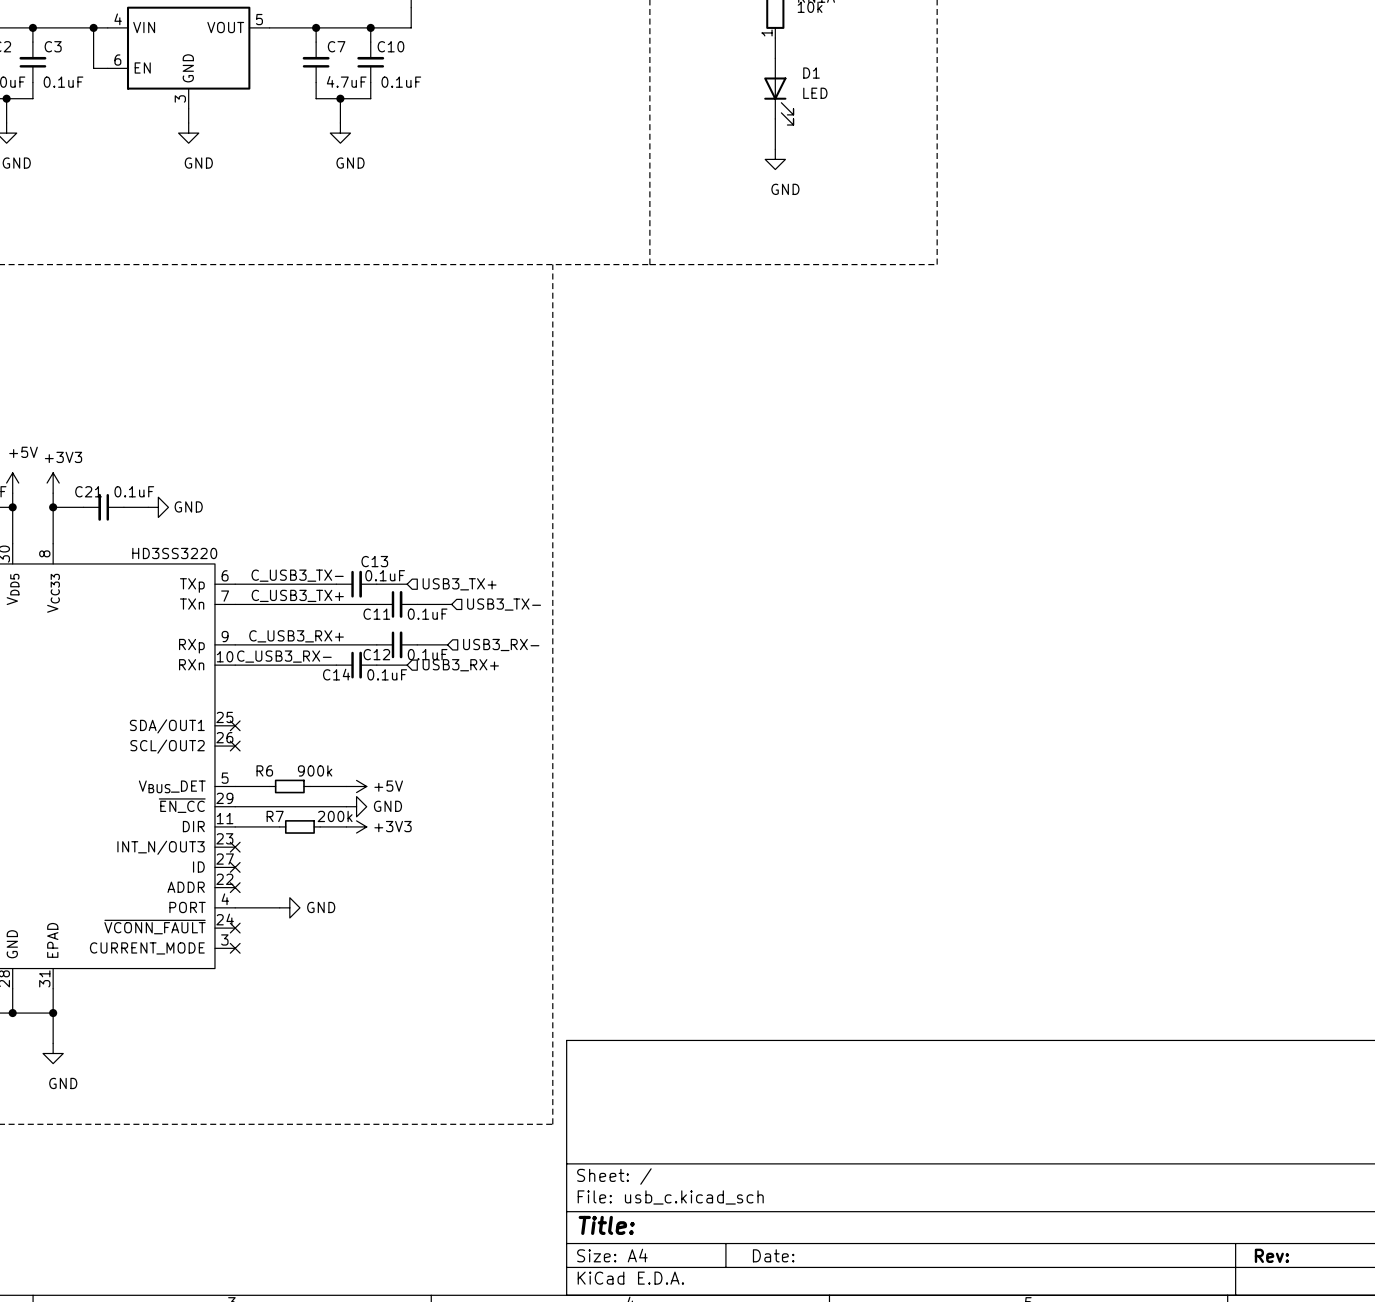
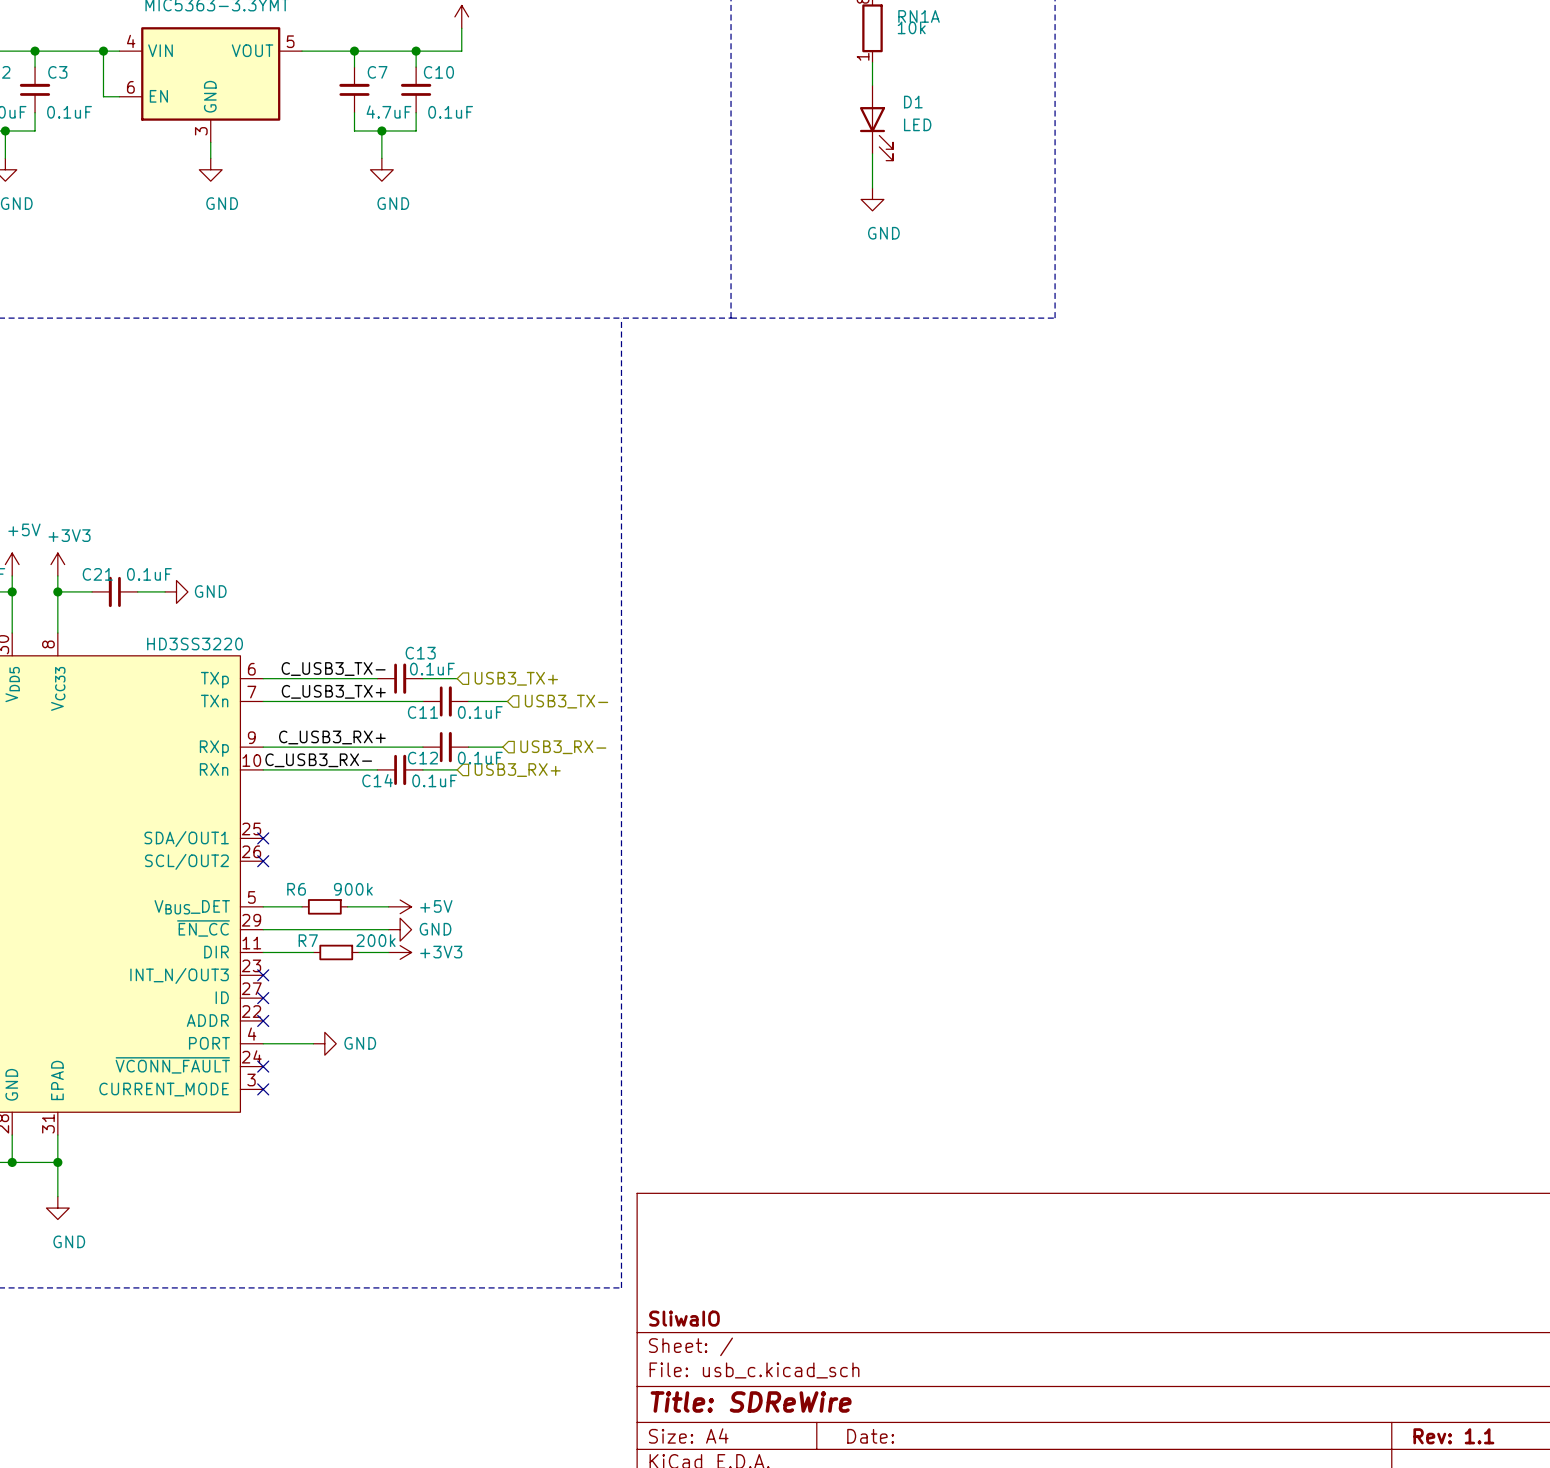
title block: none -> SliwaIO (684, 1318)
title block: Title: (606, 1225) -> Title: SDReWire (751, 1401)
title block: Rev: (1271, 1255) -> Rev: 1.1 (1453, 1436)

